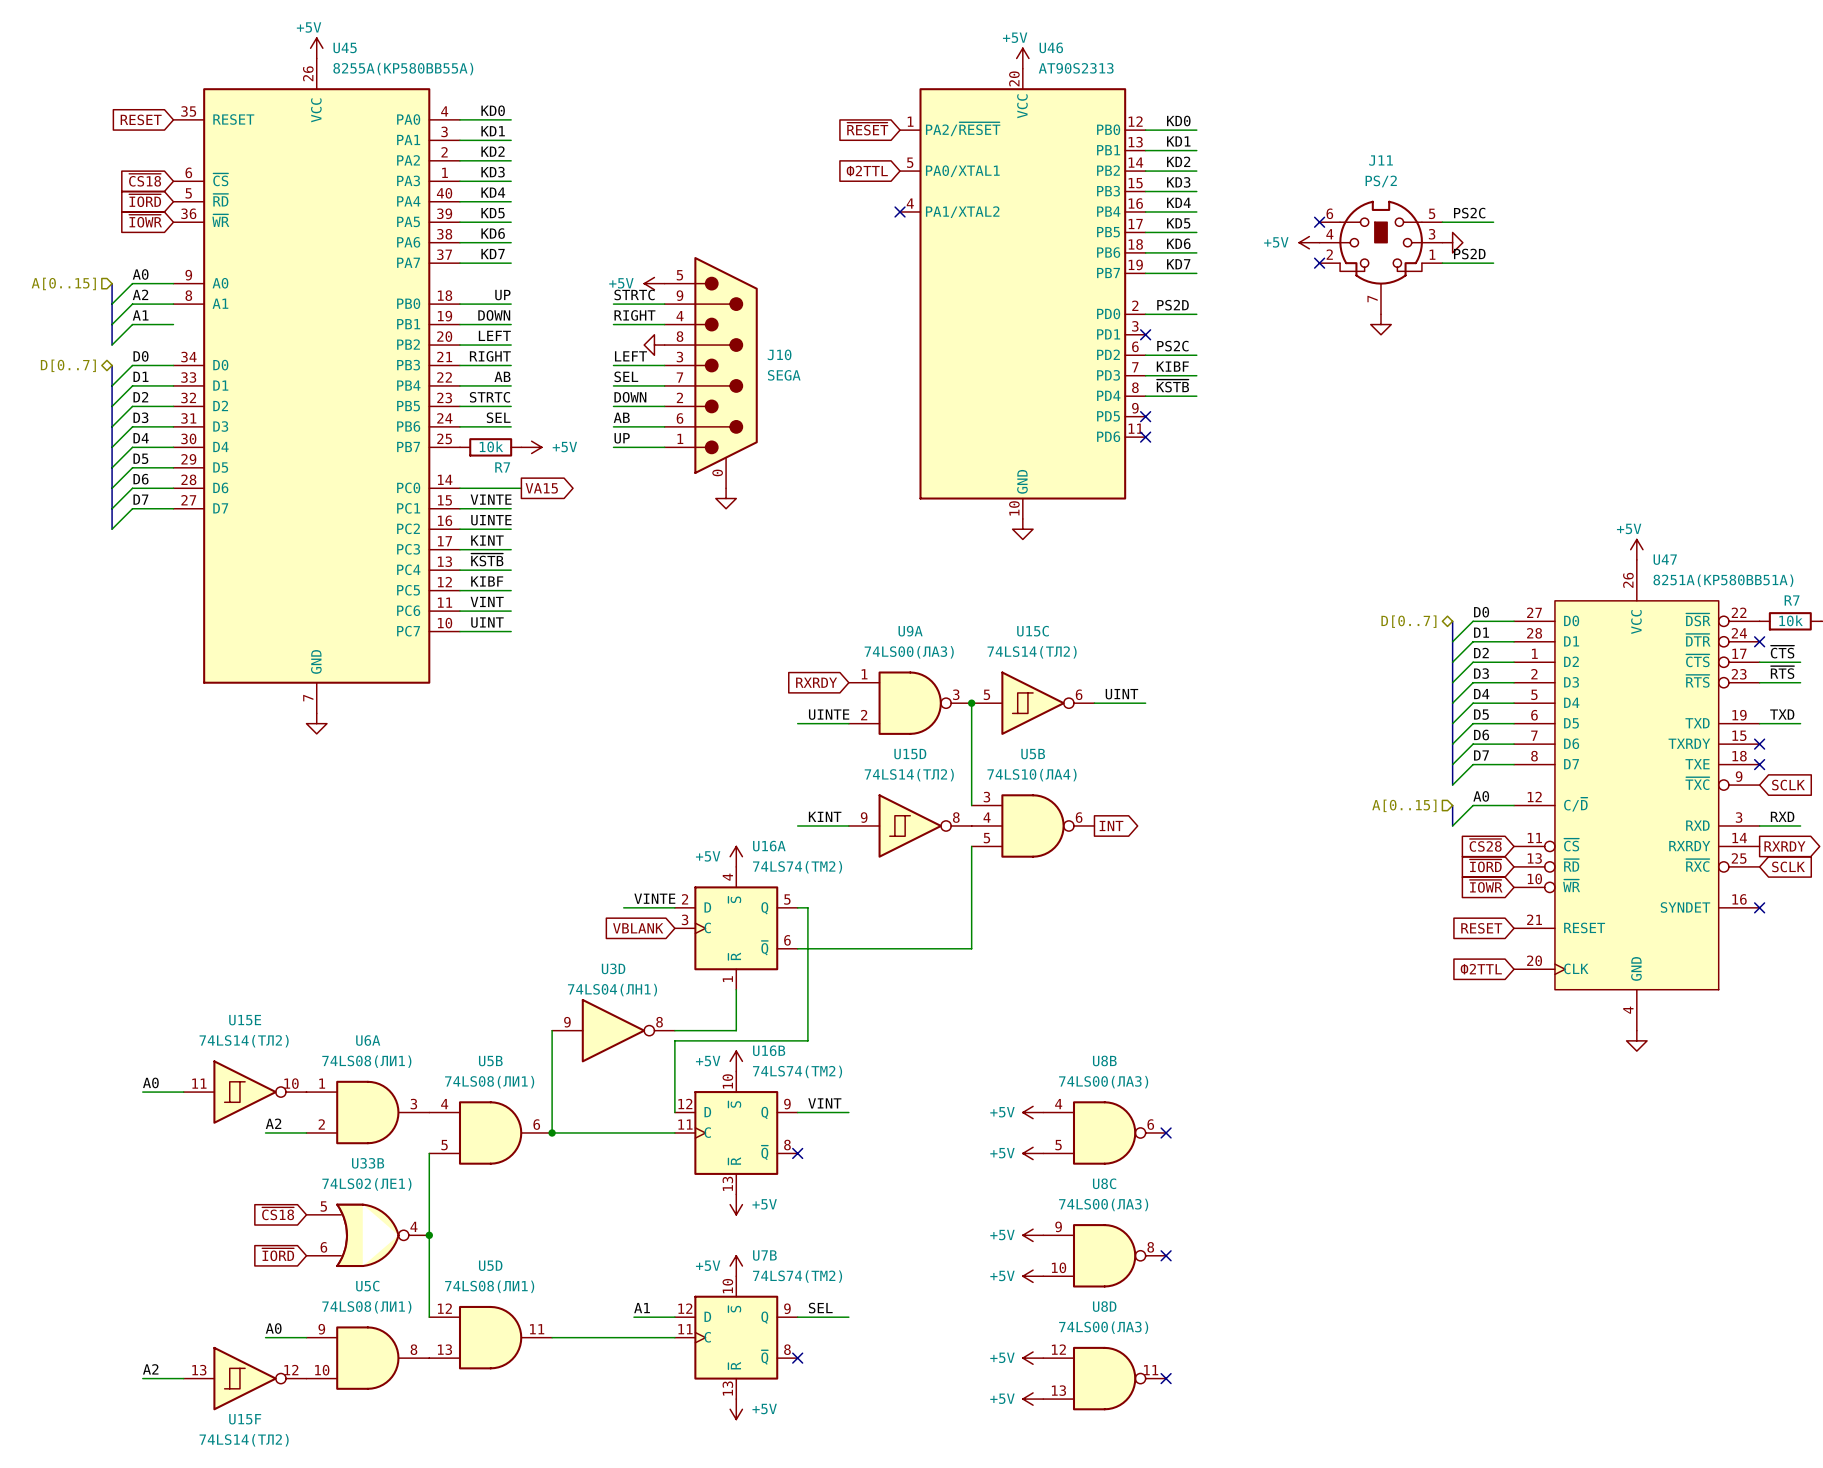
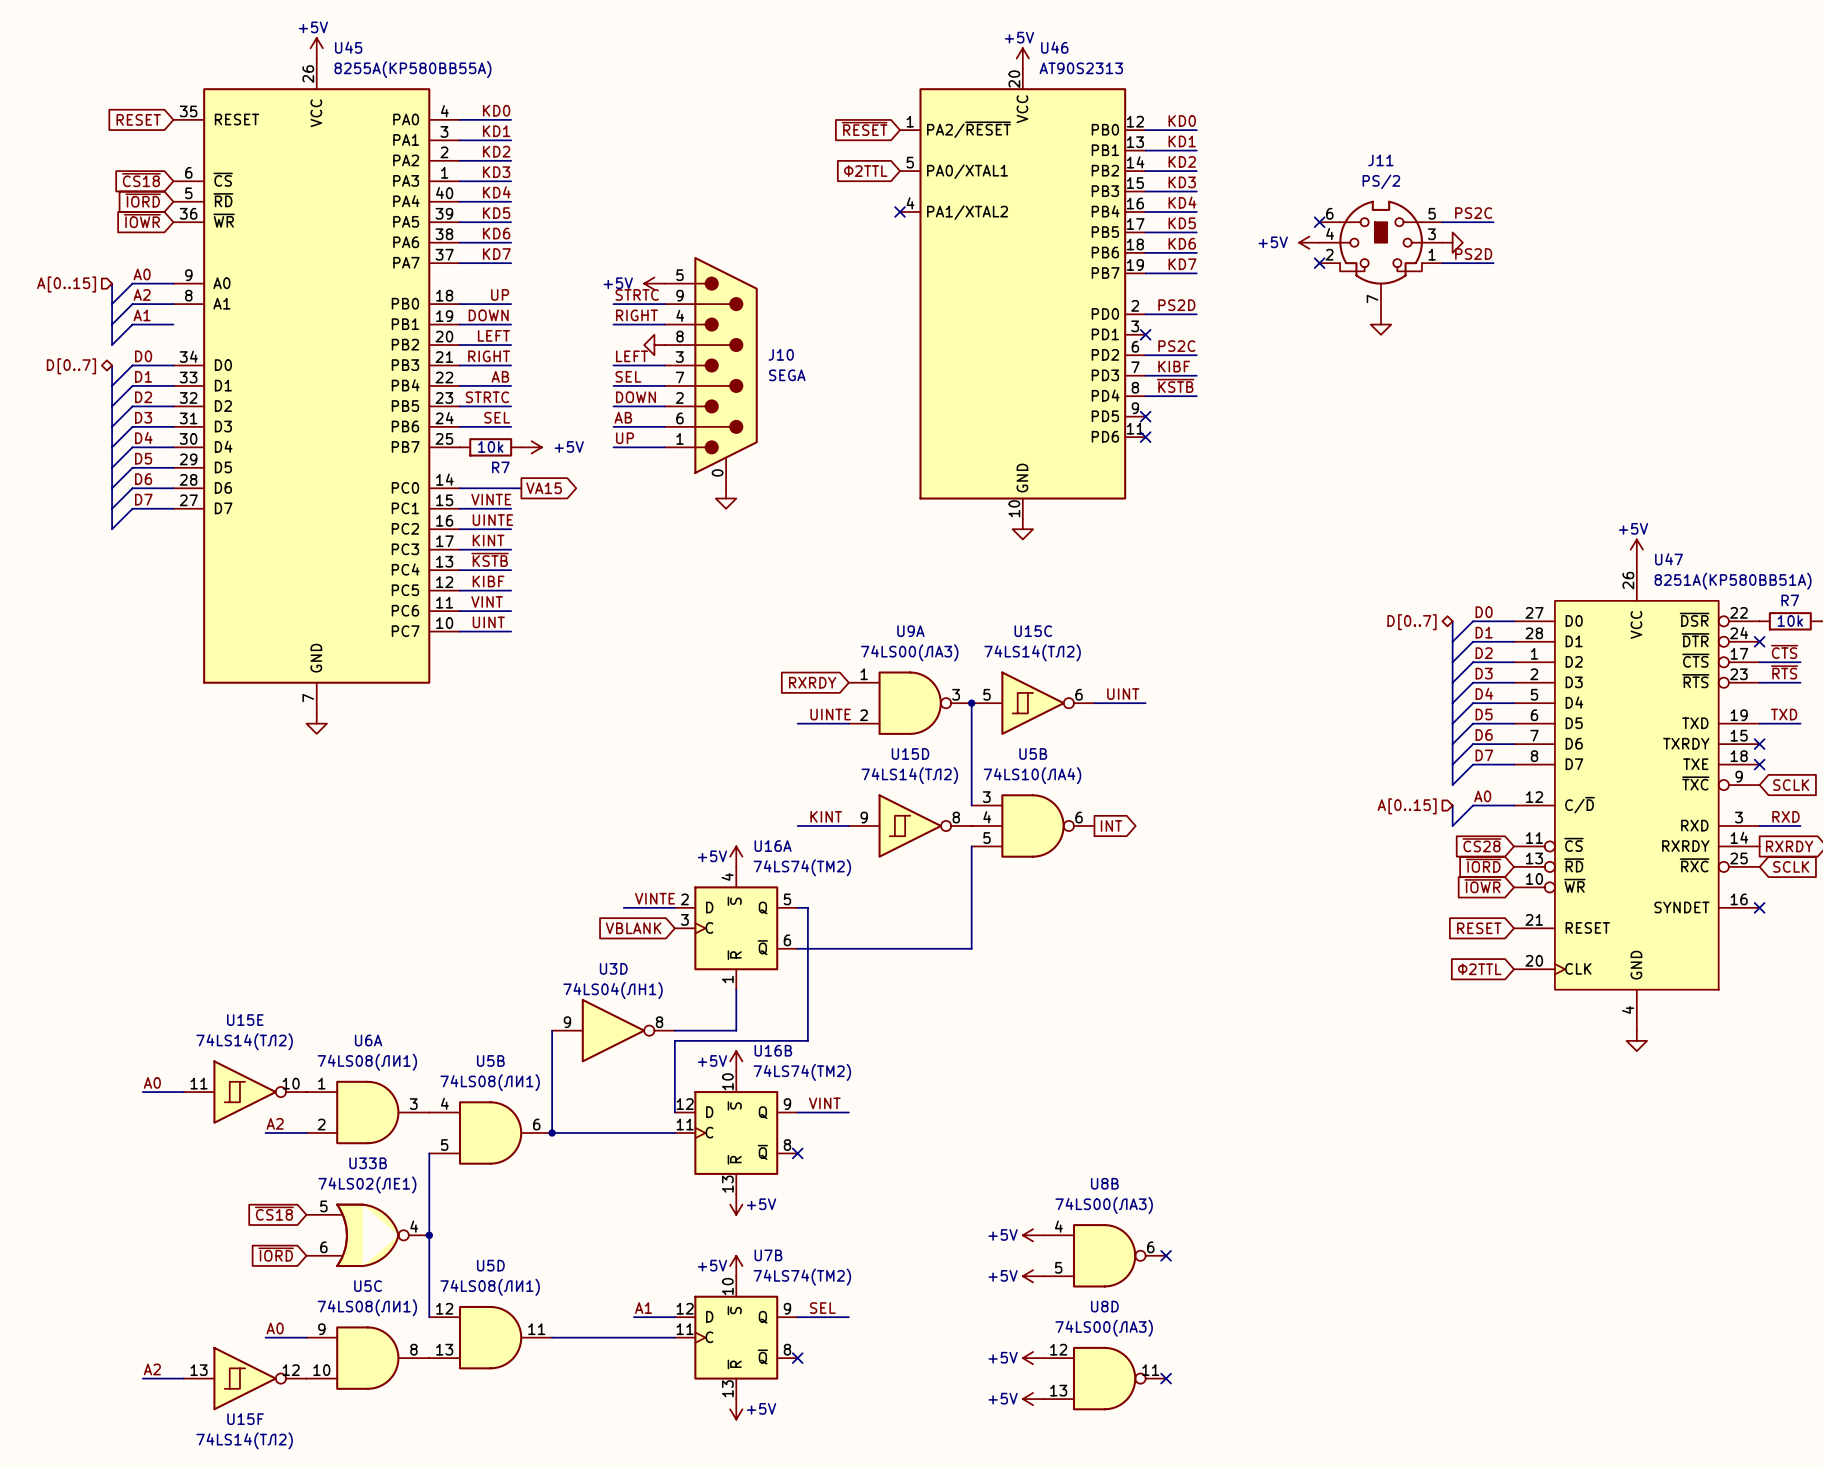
power symbol: +5V (1033, 1112) -> none
U8B position: (1104, 1132) -> (1104, 1255)
no-connect mark: (1166, 1132) -> none
power symbol: +5V (1033, 1153) -> none
U8C: 74LS00(ЛА3) (1104, 1255) -> none

